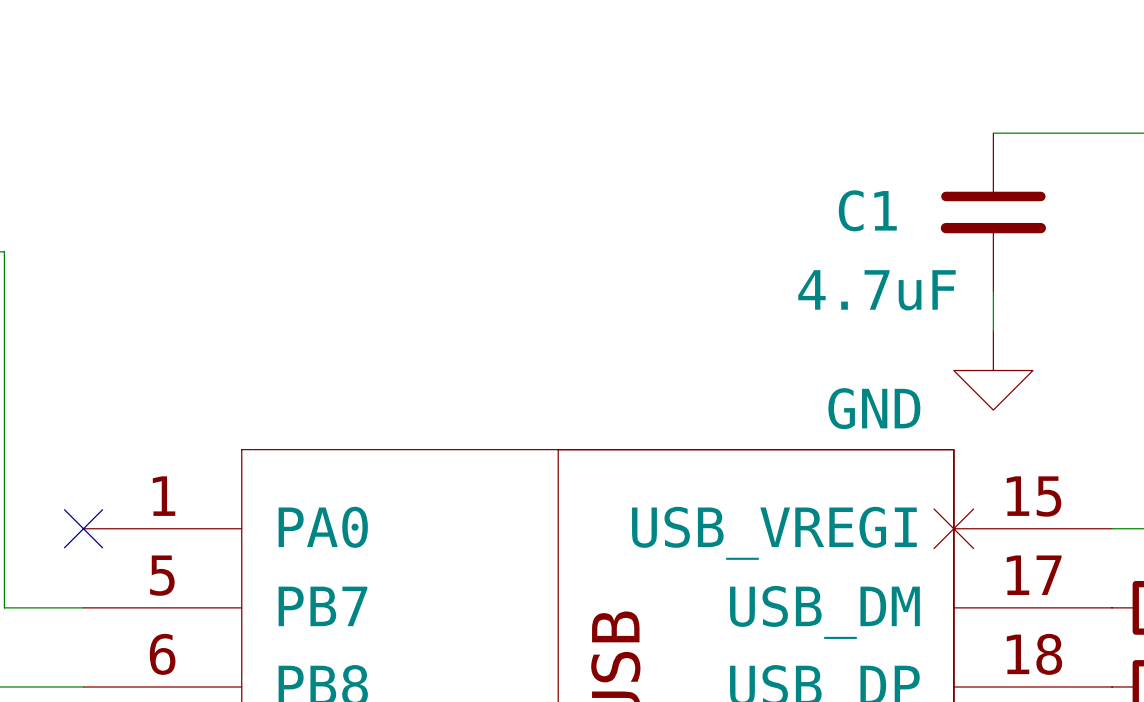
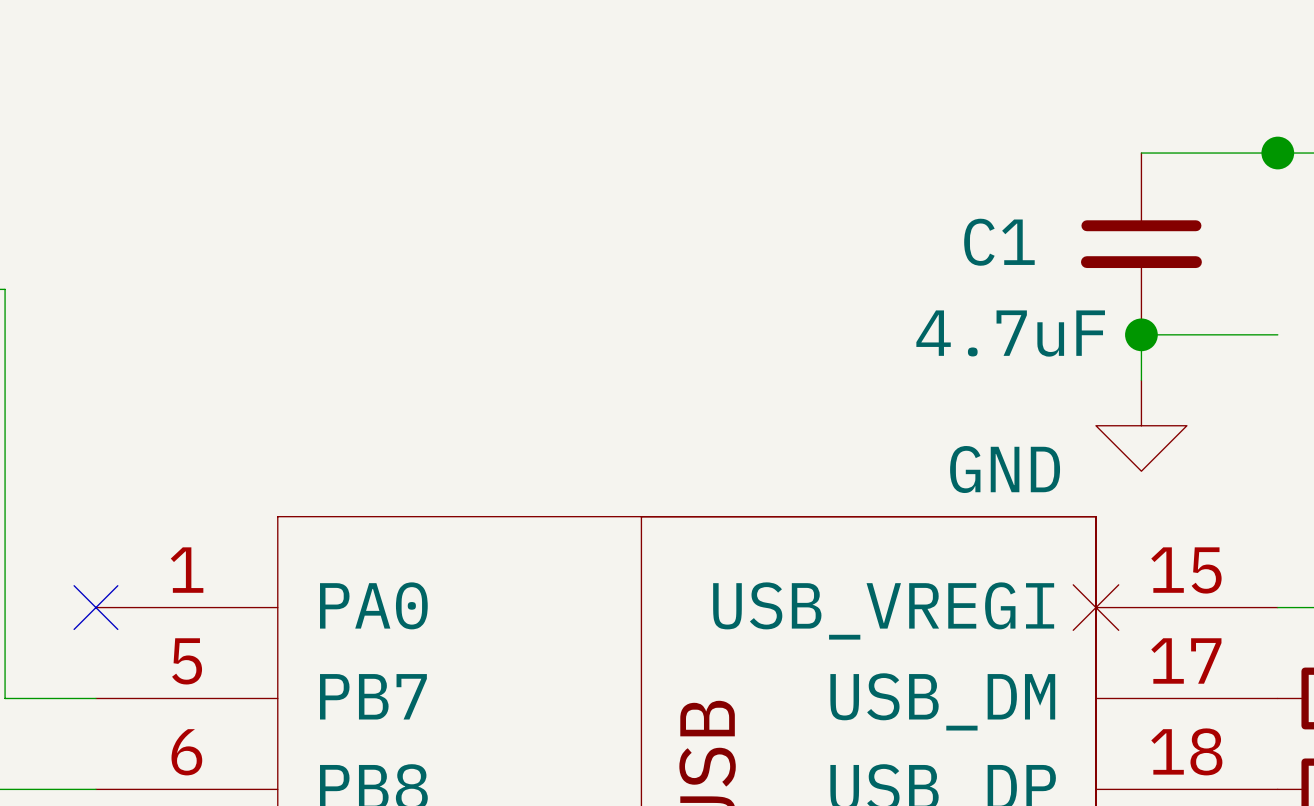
junction: none -> (1277, 153)
wire: none -> (1141, 334) (1277, 334)
junction: none -> (1141, 334)

